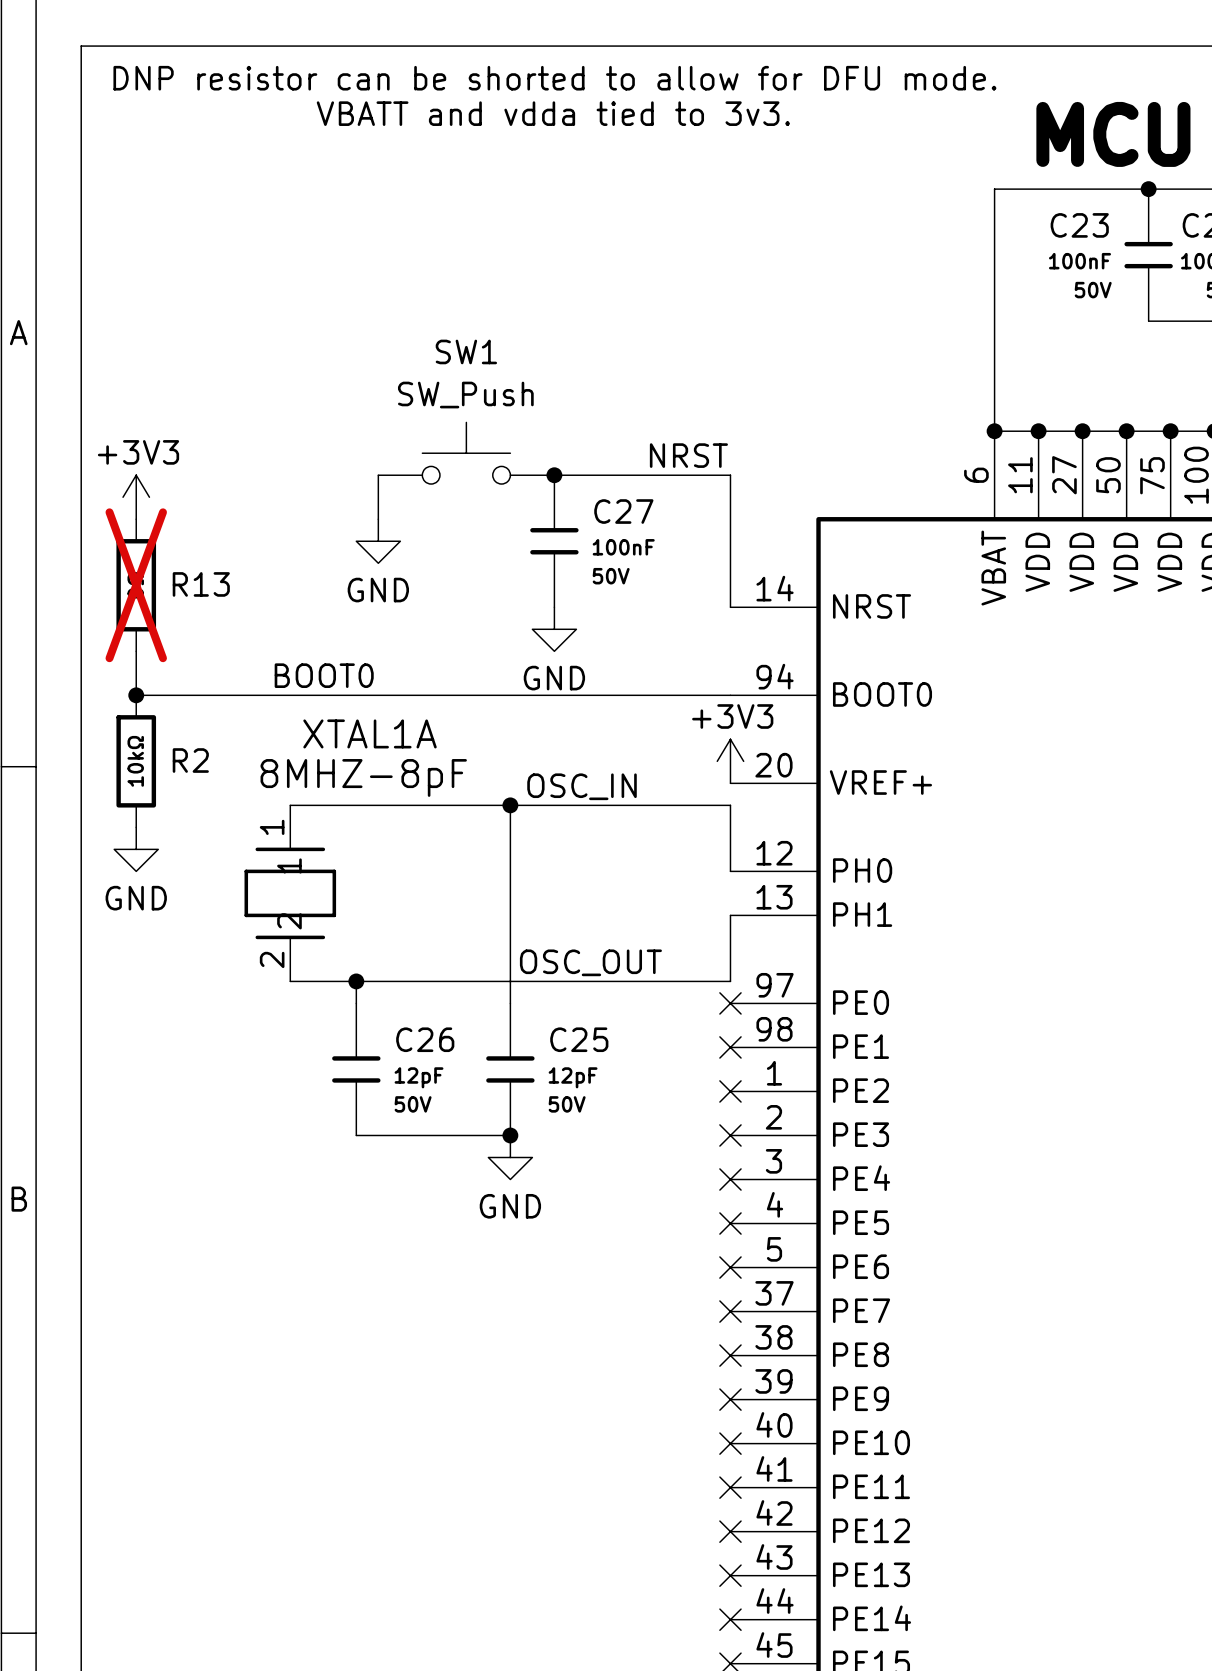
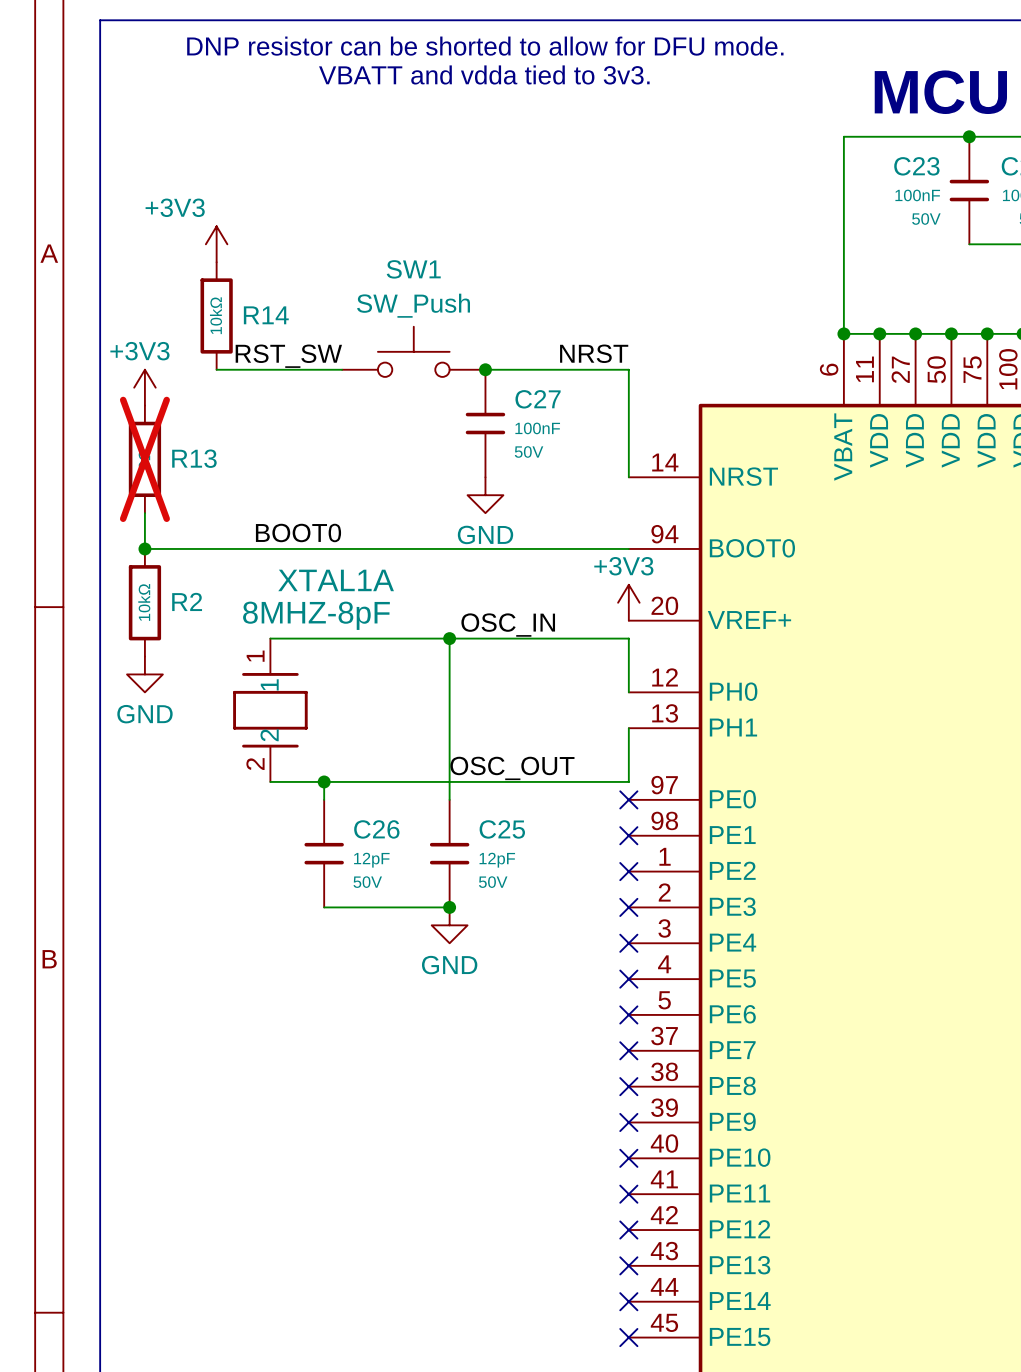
power symbol: none -> +3V3 (216, 244)
R14: none -> 10kΩ (216, 315)
label: none -> RST_SW (288, 356)
wire: (378, 475) (378, 519) -> (342, 369) (216, 369)
power symbol: GND (378, 541) -> none

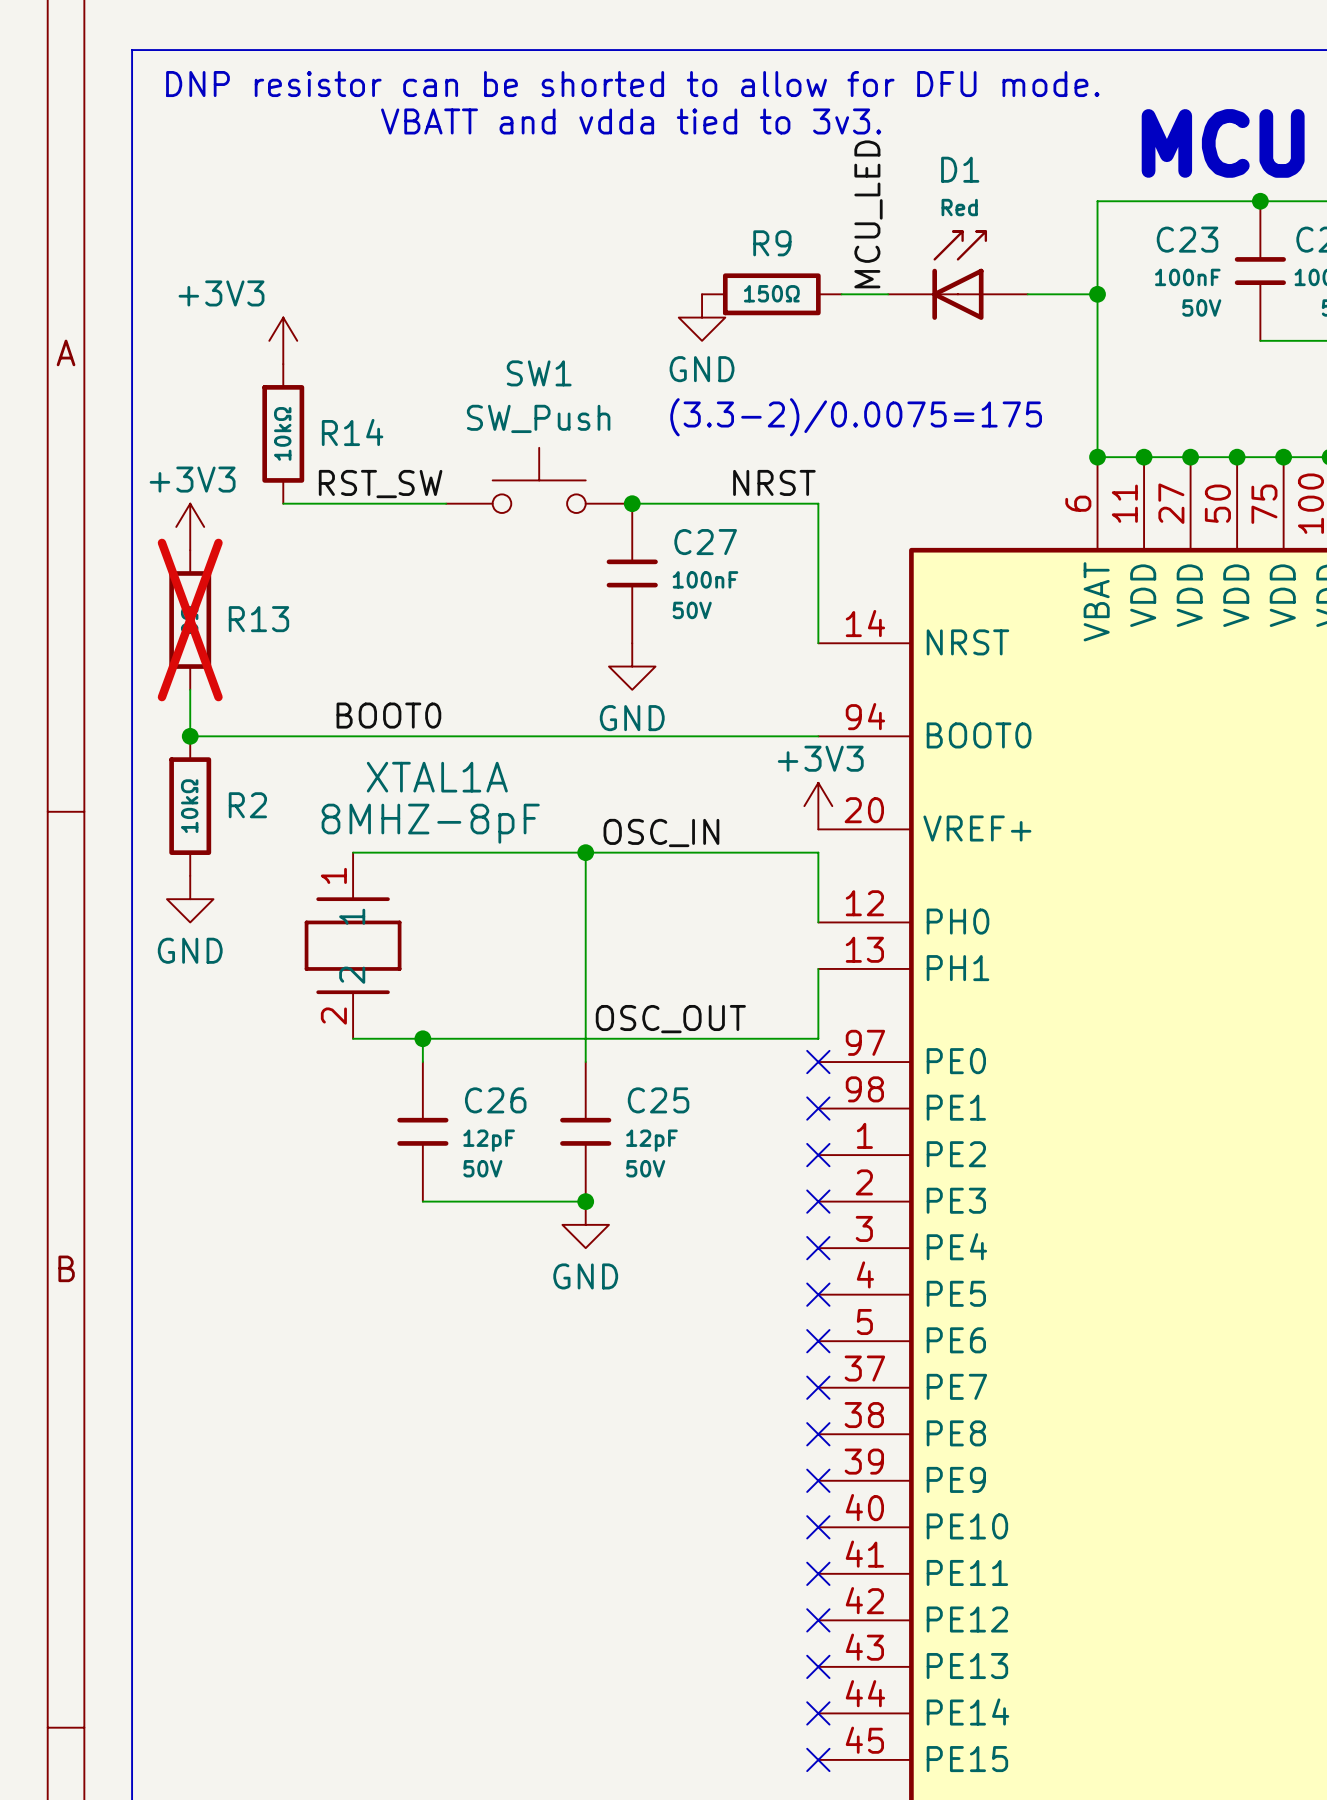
label: none -> MCU_LED (868, 214)
D1: none -> Red (957, 275)
R9: none -> 150Ω (771, 294)
wire: none -> (841, 294) (888, 294)
wire: none -> (1027, 294) (1097, 294)
junction: none -> (1097, 294)
power symbol: none -> GND (702, 317)
text: none -> (3.3-2)/0.0075=175 (856, 417)

